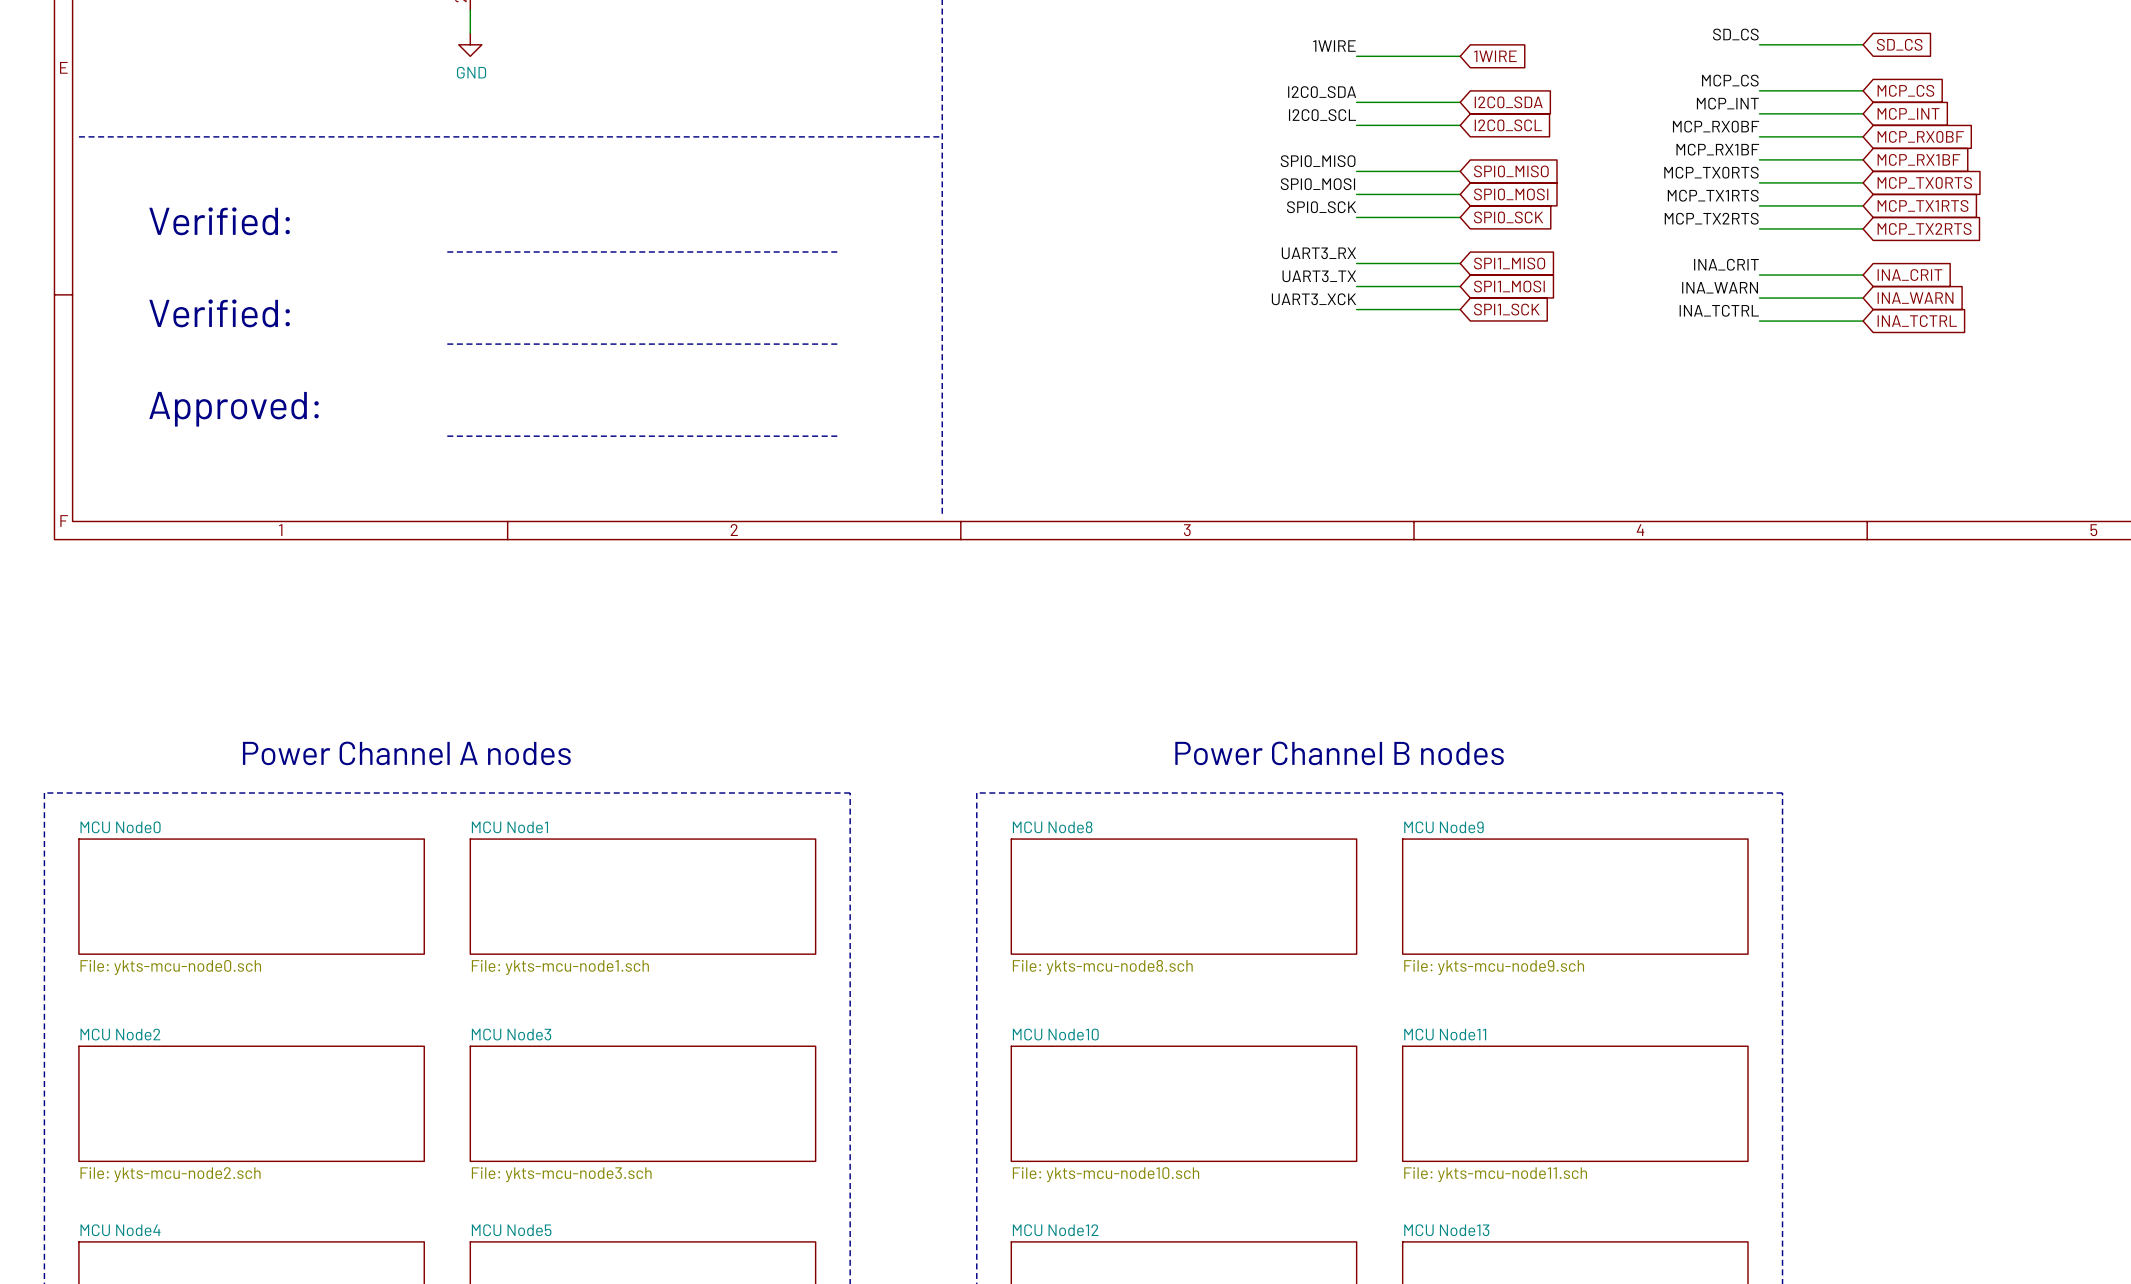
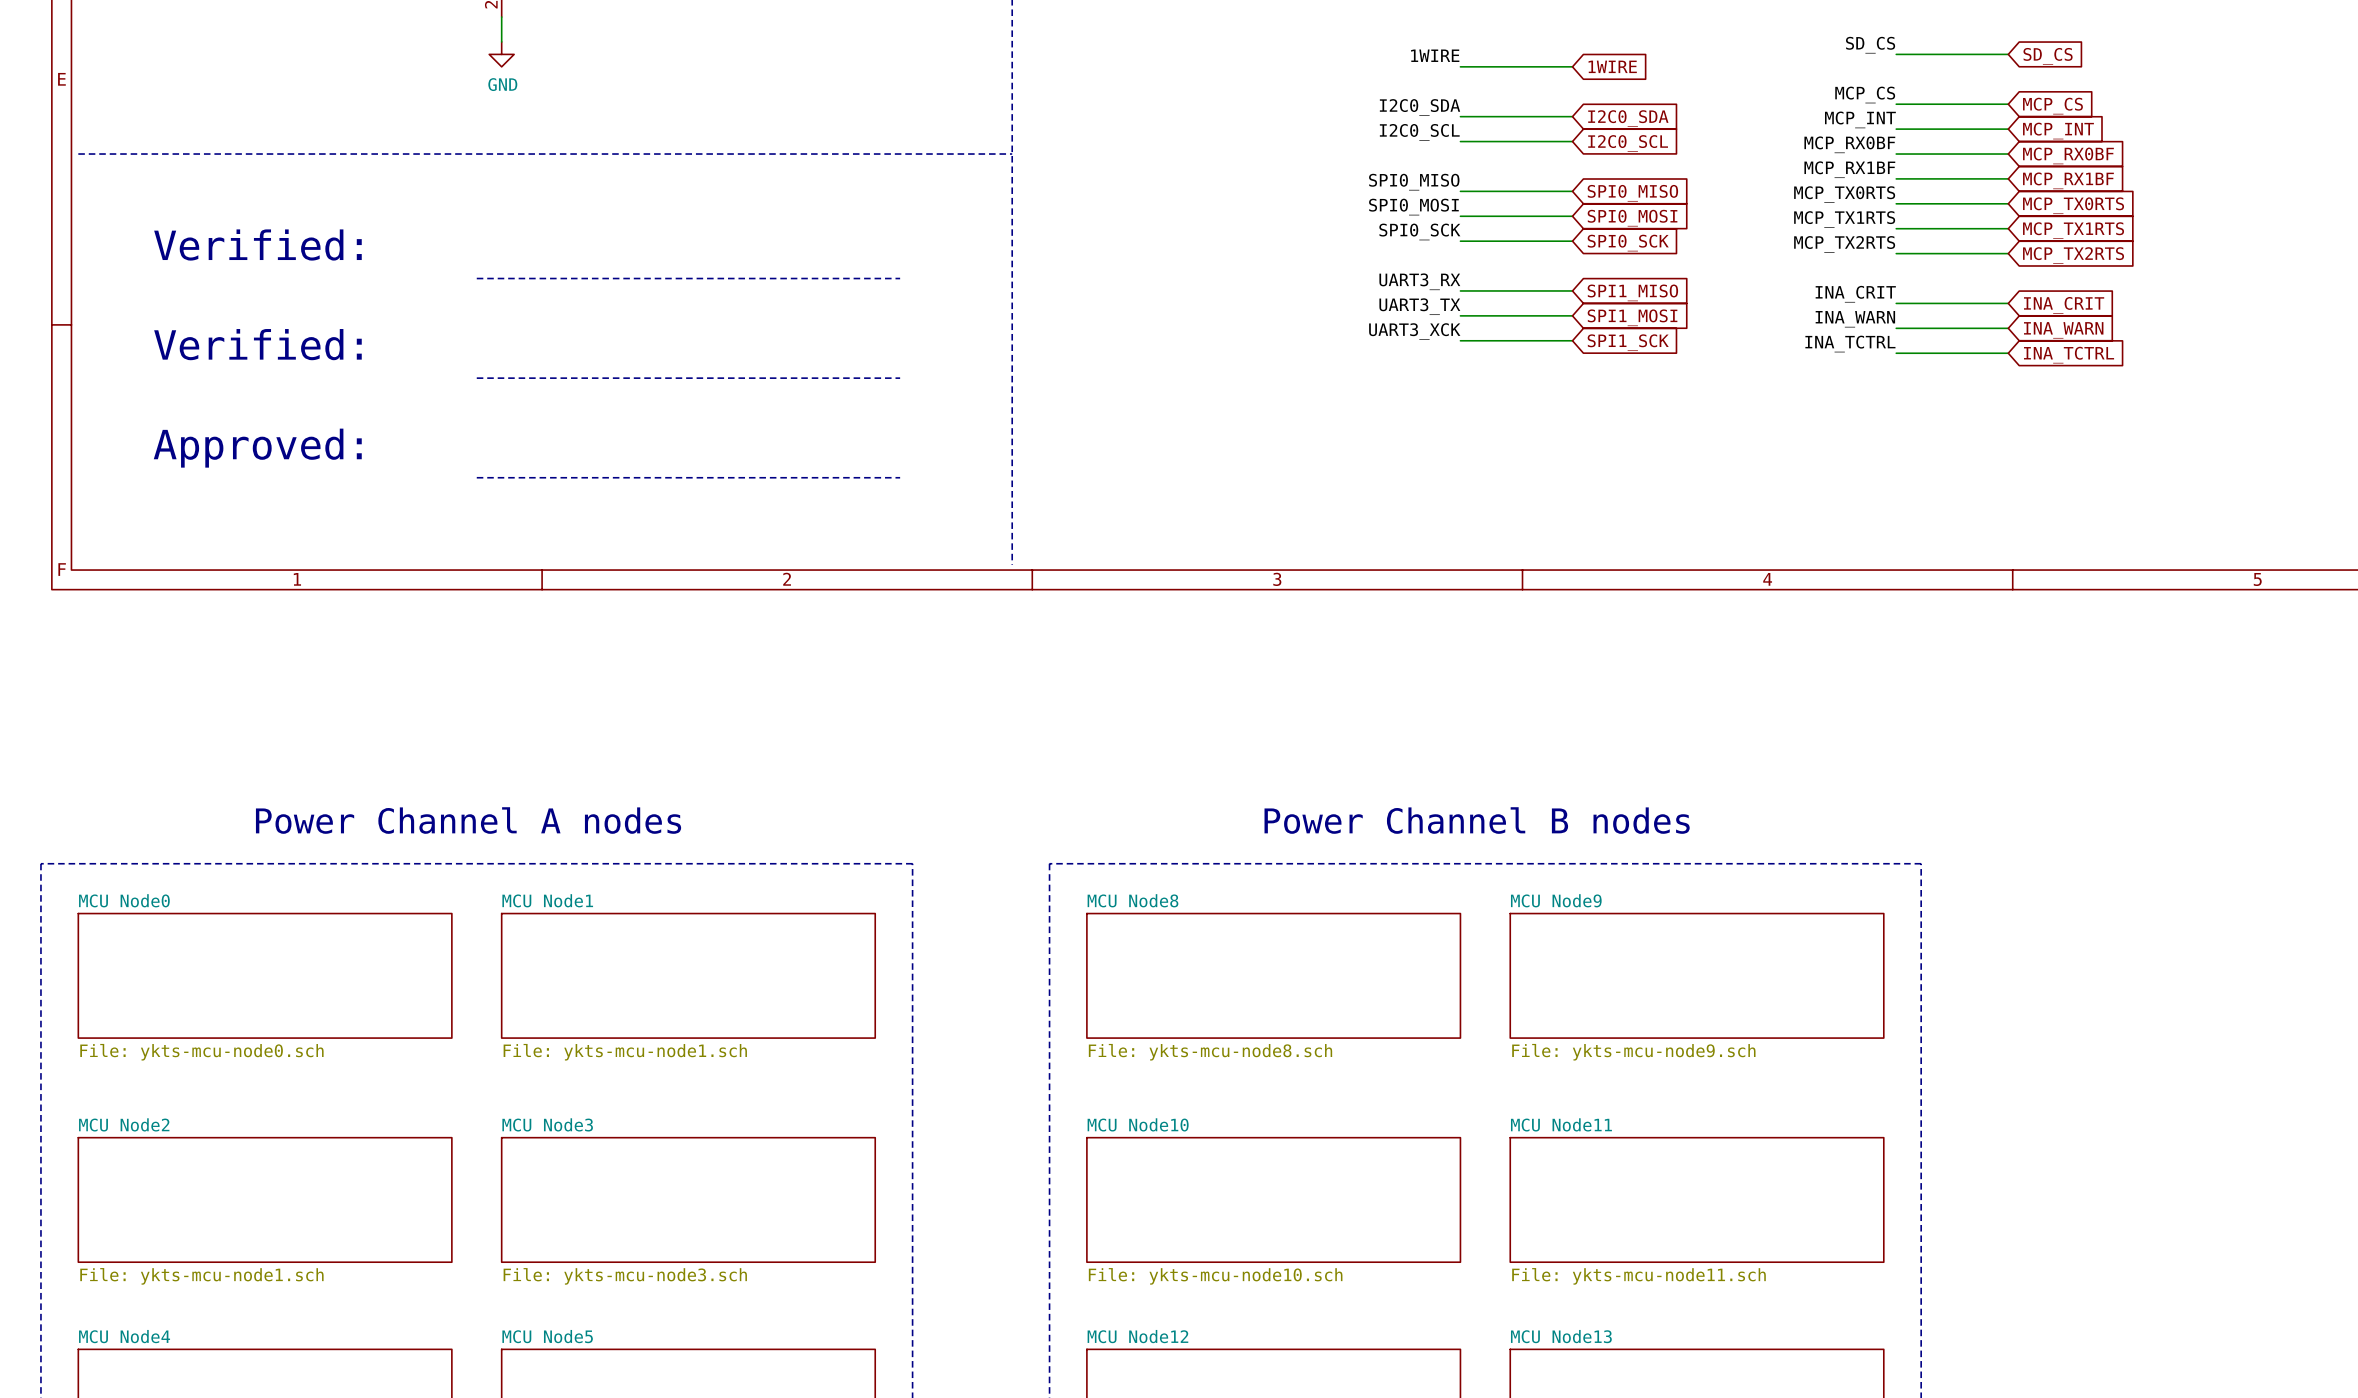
sheet MCU Node2 value: File: ykts-mcu-node2.sch (170, 1174) -> File: ykts-mcu-node1.sch (201, 1276)

